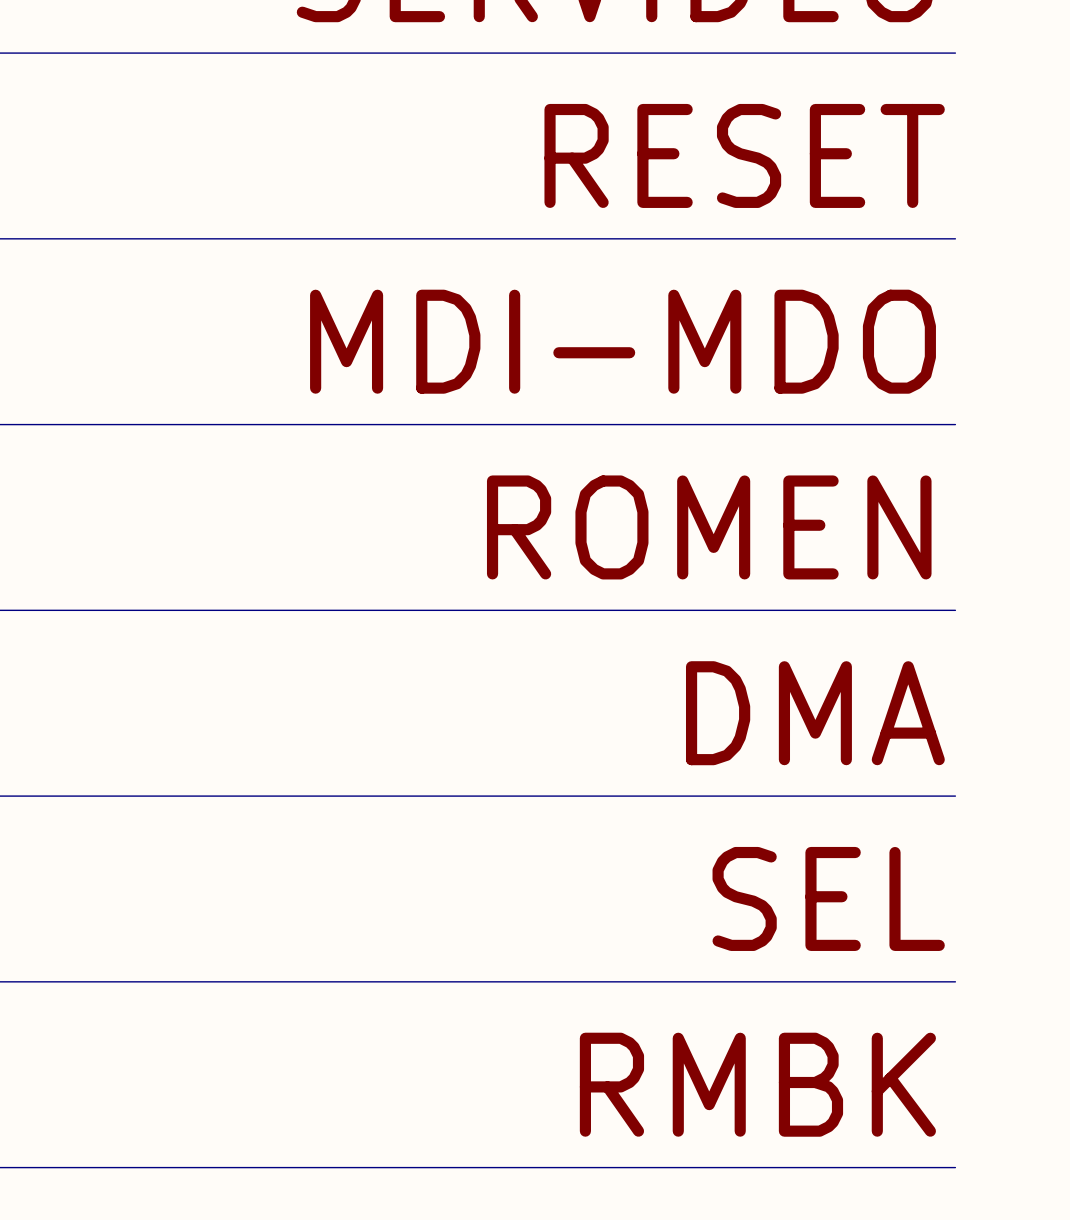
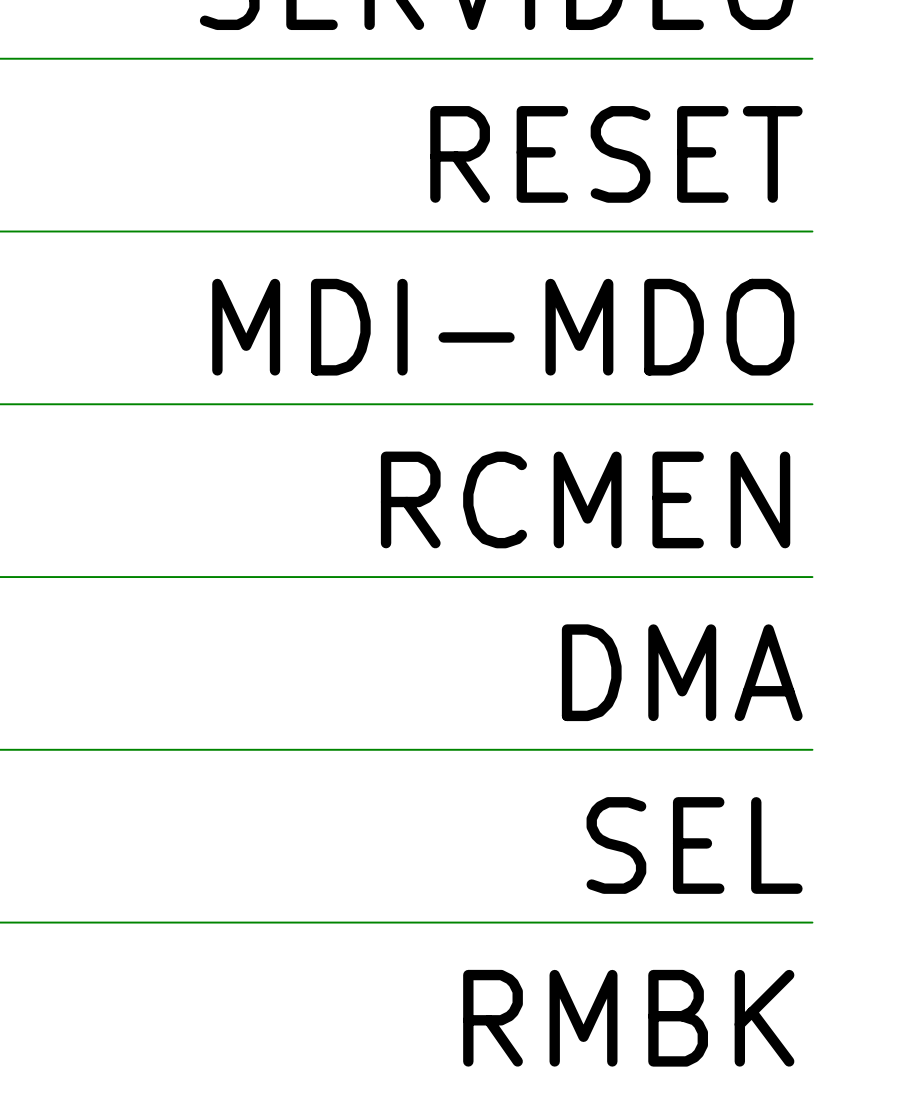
label: ROMEN (709, 527) -> RCMEN (585, 499)

